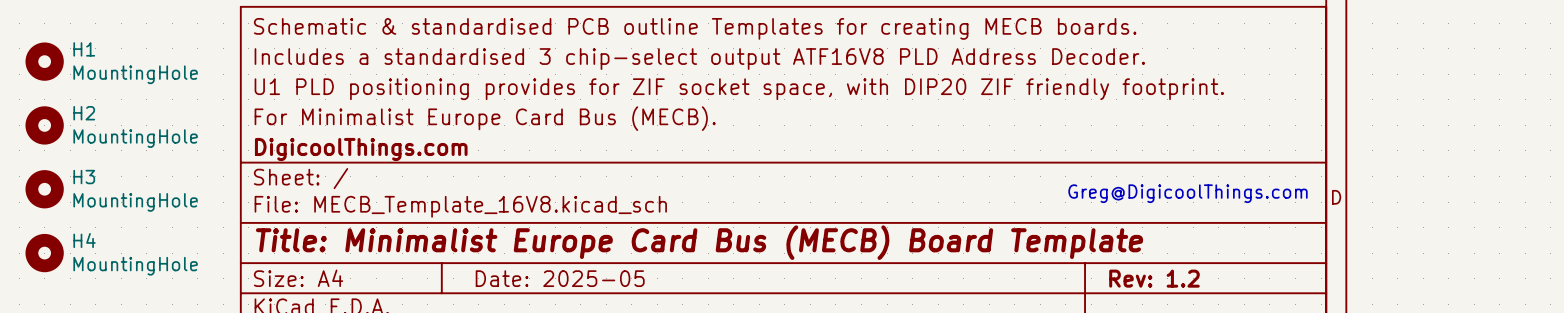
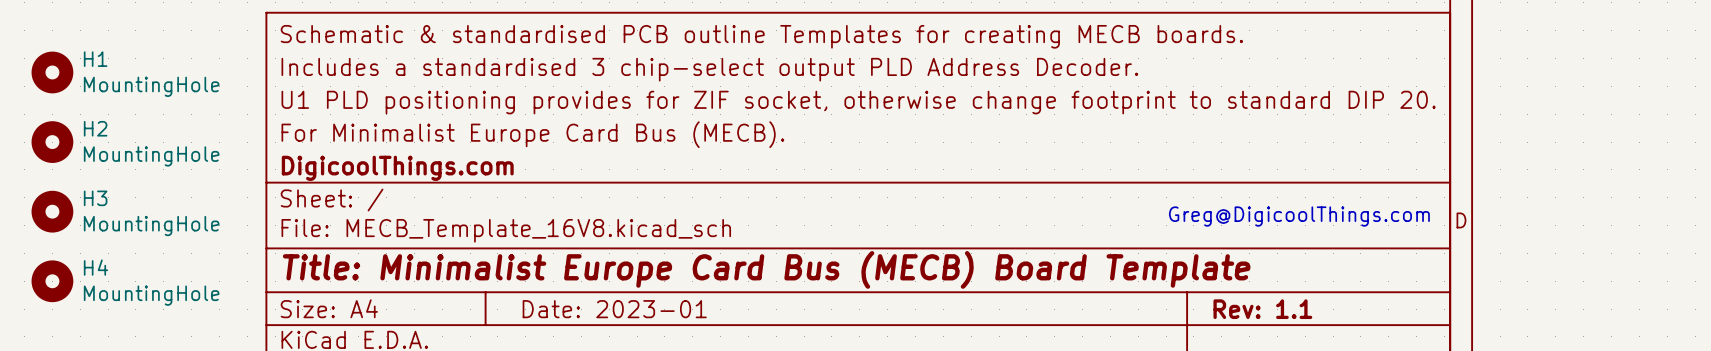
title block: Includes a standardised 3 chip-select output ATF16V8 PLD Address Decoder. (699, 59) -> Includes a standardised 3 chip-select output PLD Address Decoder. (709, 69)
title block: U1 PLD positioning provides for ZIF socket space, with DIP20 ZIF friendly footprint. (739, 89) -> U1 PLD positioning provides for ZIF socket, otherwise change footprint to standard DIP 20. (858, 102)
title block: Date: 2025-05 (560, 278) -> Date: 2023-01 (614, 309)
title block: Rev: 1.2 (1154, 278) -> Rev: 1.1 (1262, 309)

